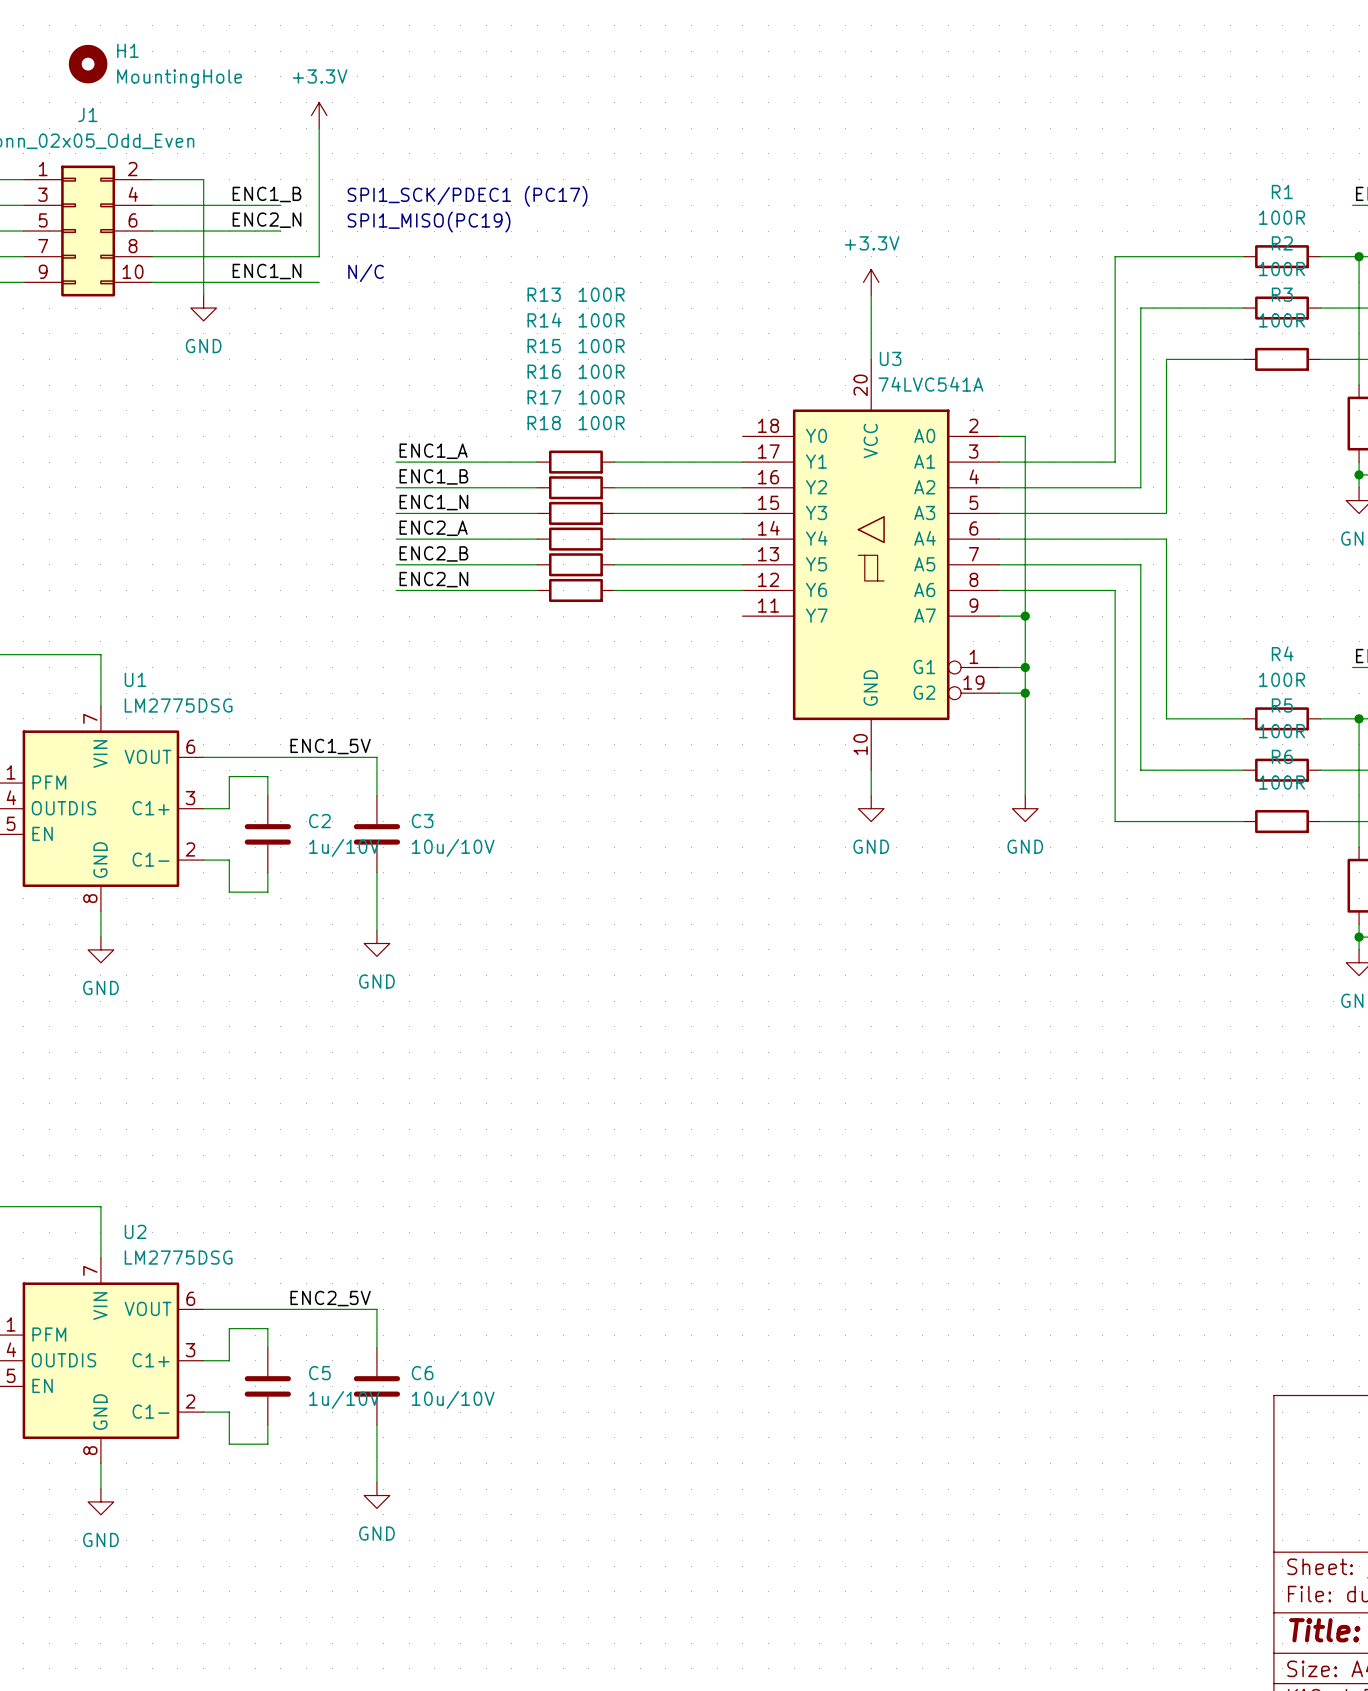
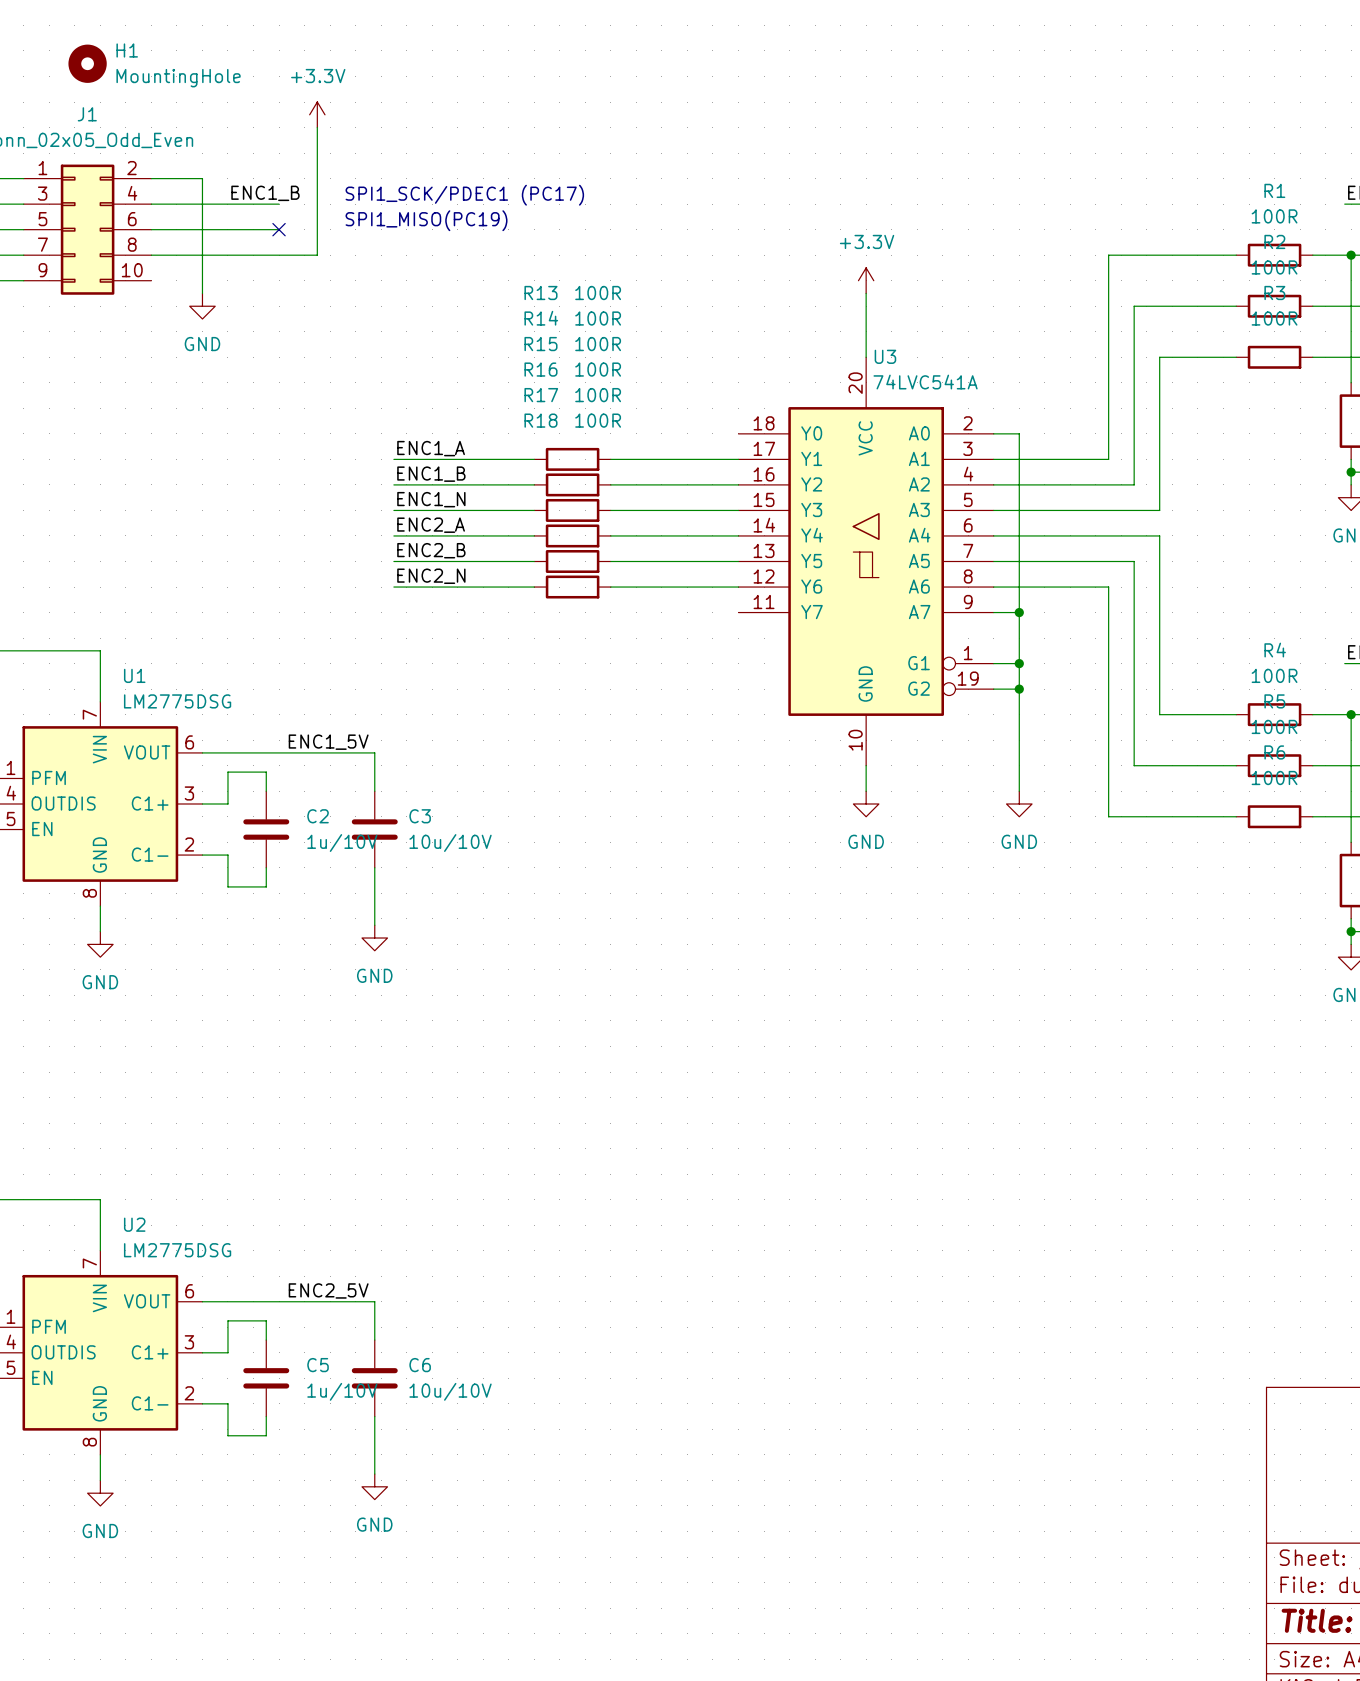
label: ENC2_N (267, 220) -> none
no-connect mark: none -> (279, 229)
label: ENC1_N (267, 271) -> none
text: N/C (366, 273) -> none
wire: (152, 282) (319, 282) -> none

